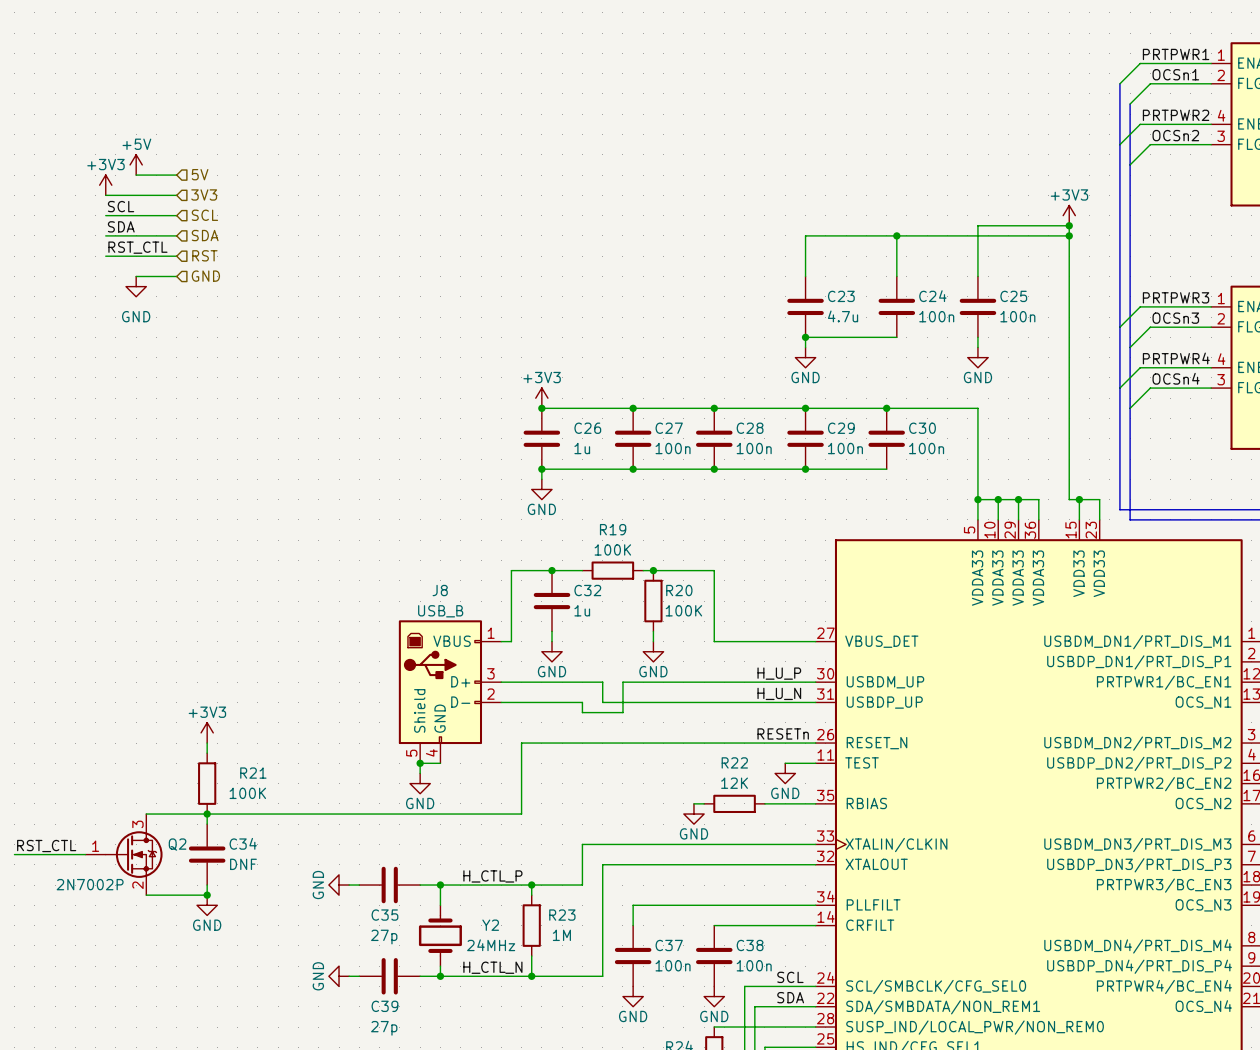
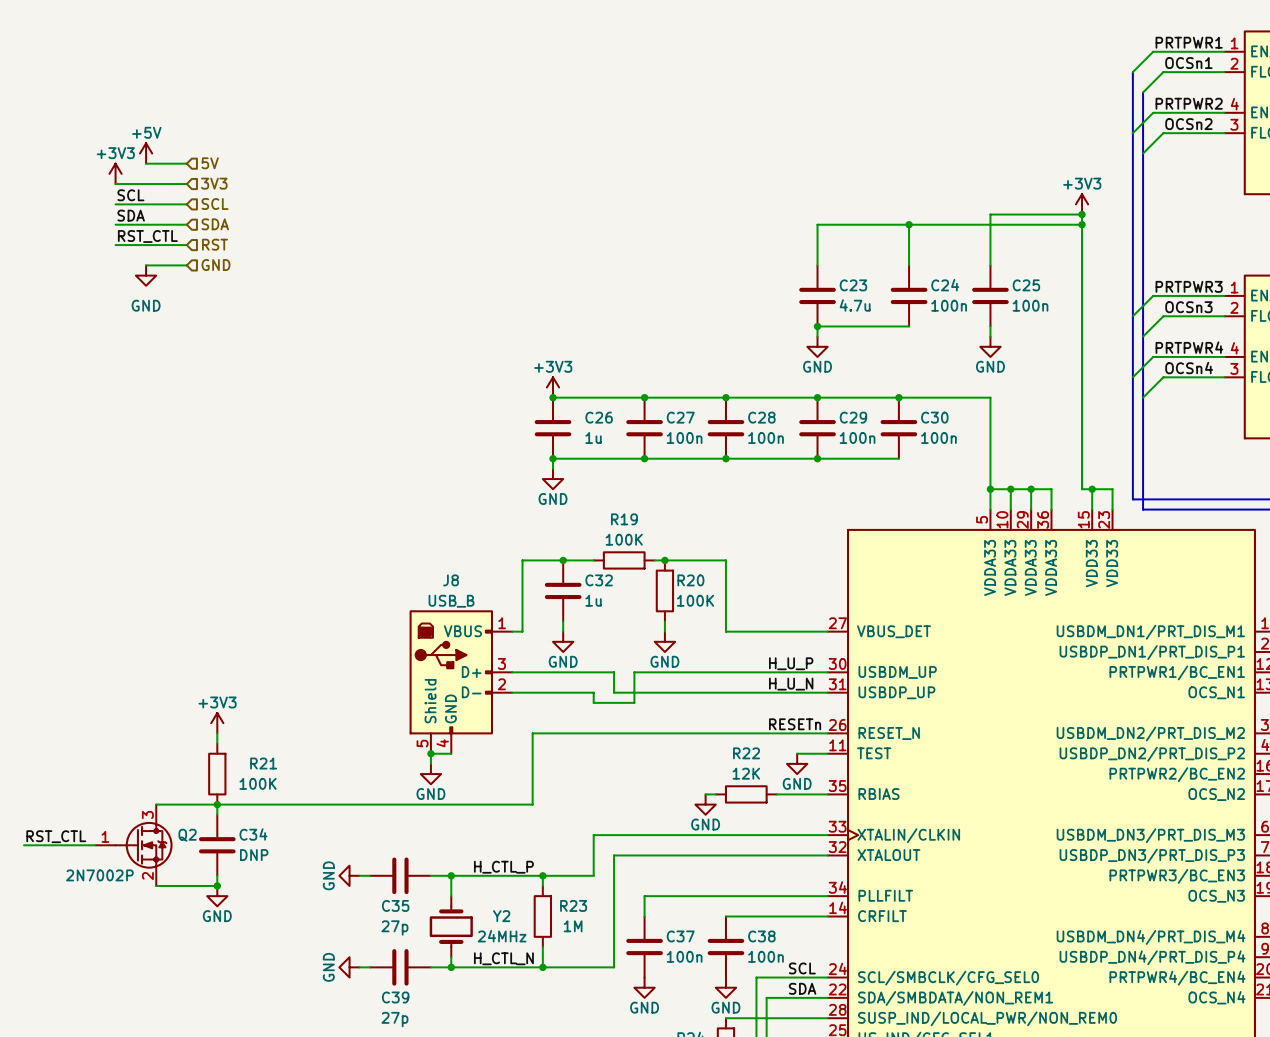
C34 value: DNF (243, 864) -> DNP (254, 855)

